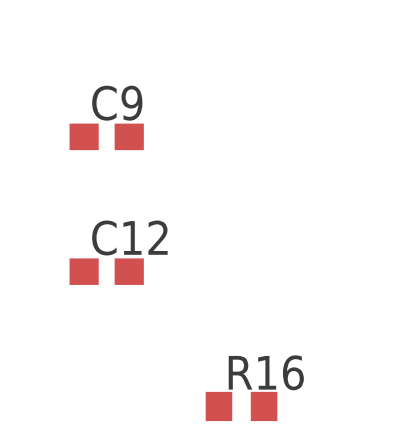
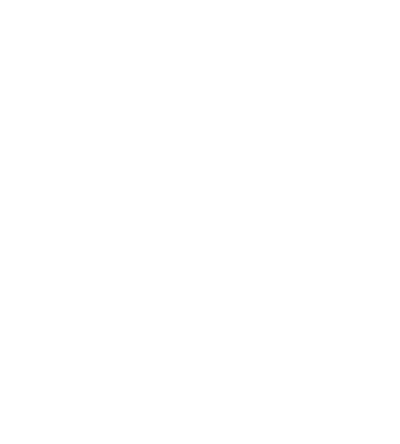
C9: (106, 136) -> none
C12: (106, 271) -> none
R16: (241, 406) -> none

